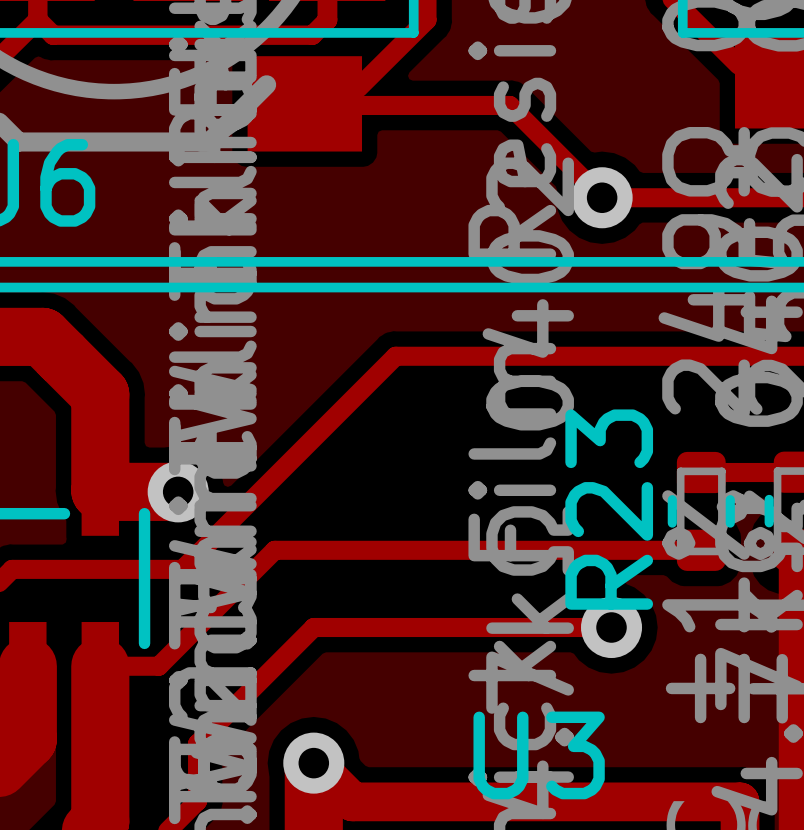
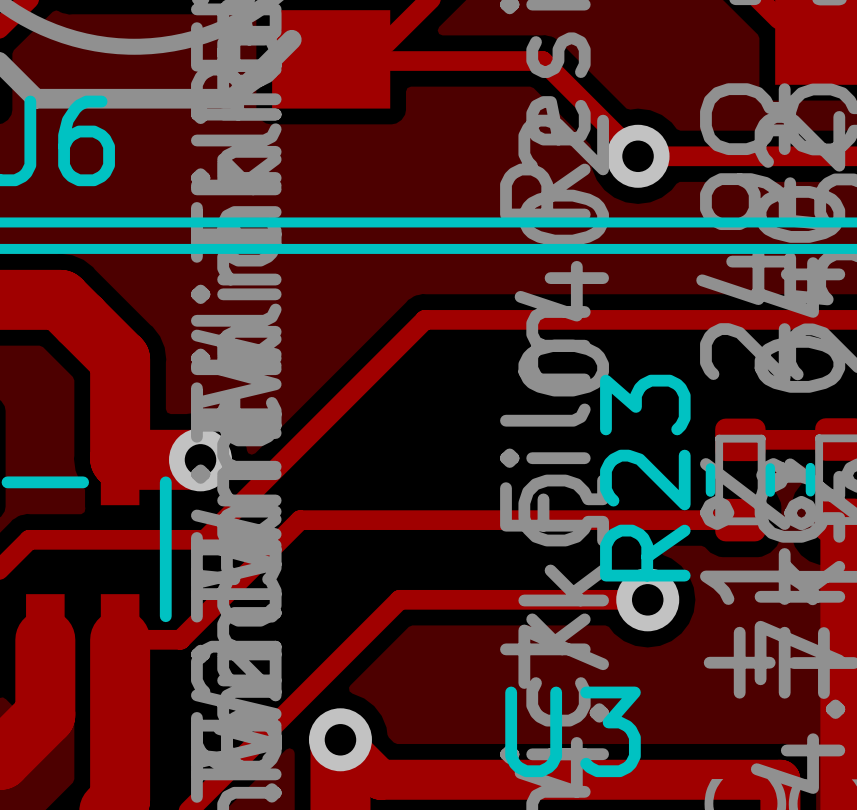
track: (371, 627) (313, 627) (197, 743) (197, 801) -> (399, 599) (220, 779)

